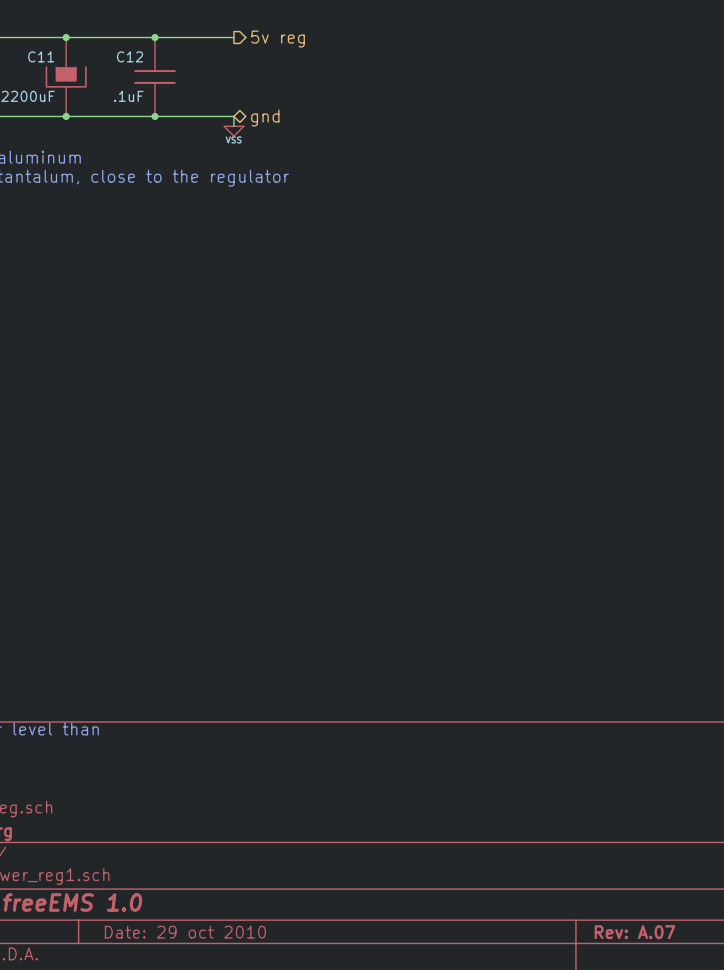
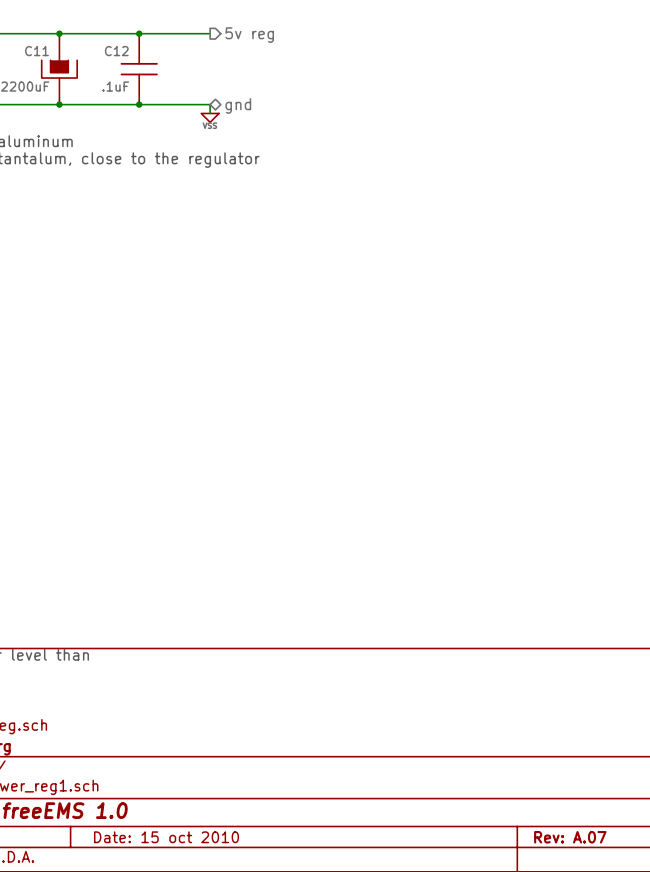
title block: Date: 29 oct 2010 (185, 932) -> Date: 15 oct 2010 (166, 837)

